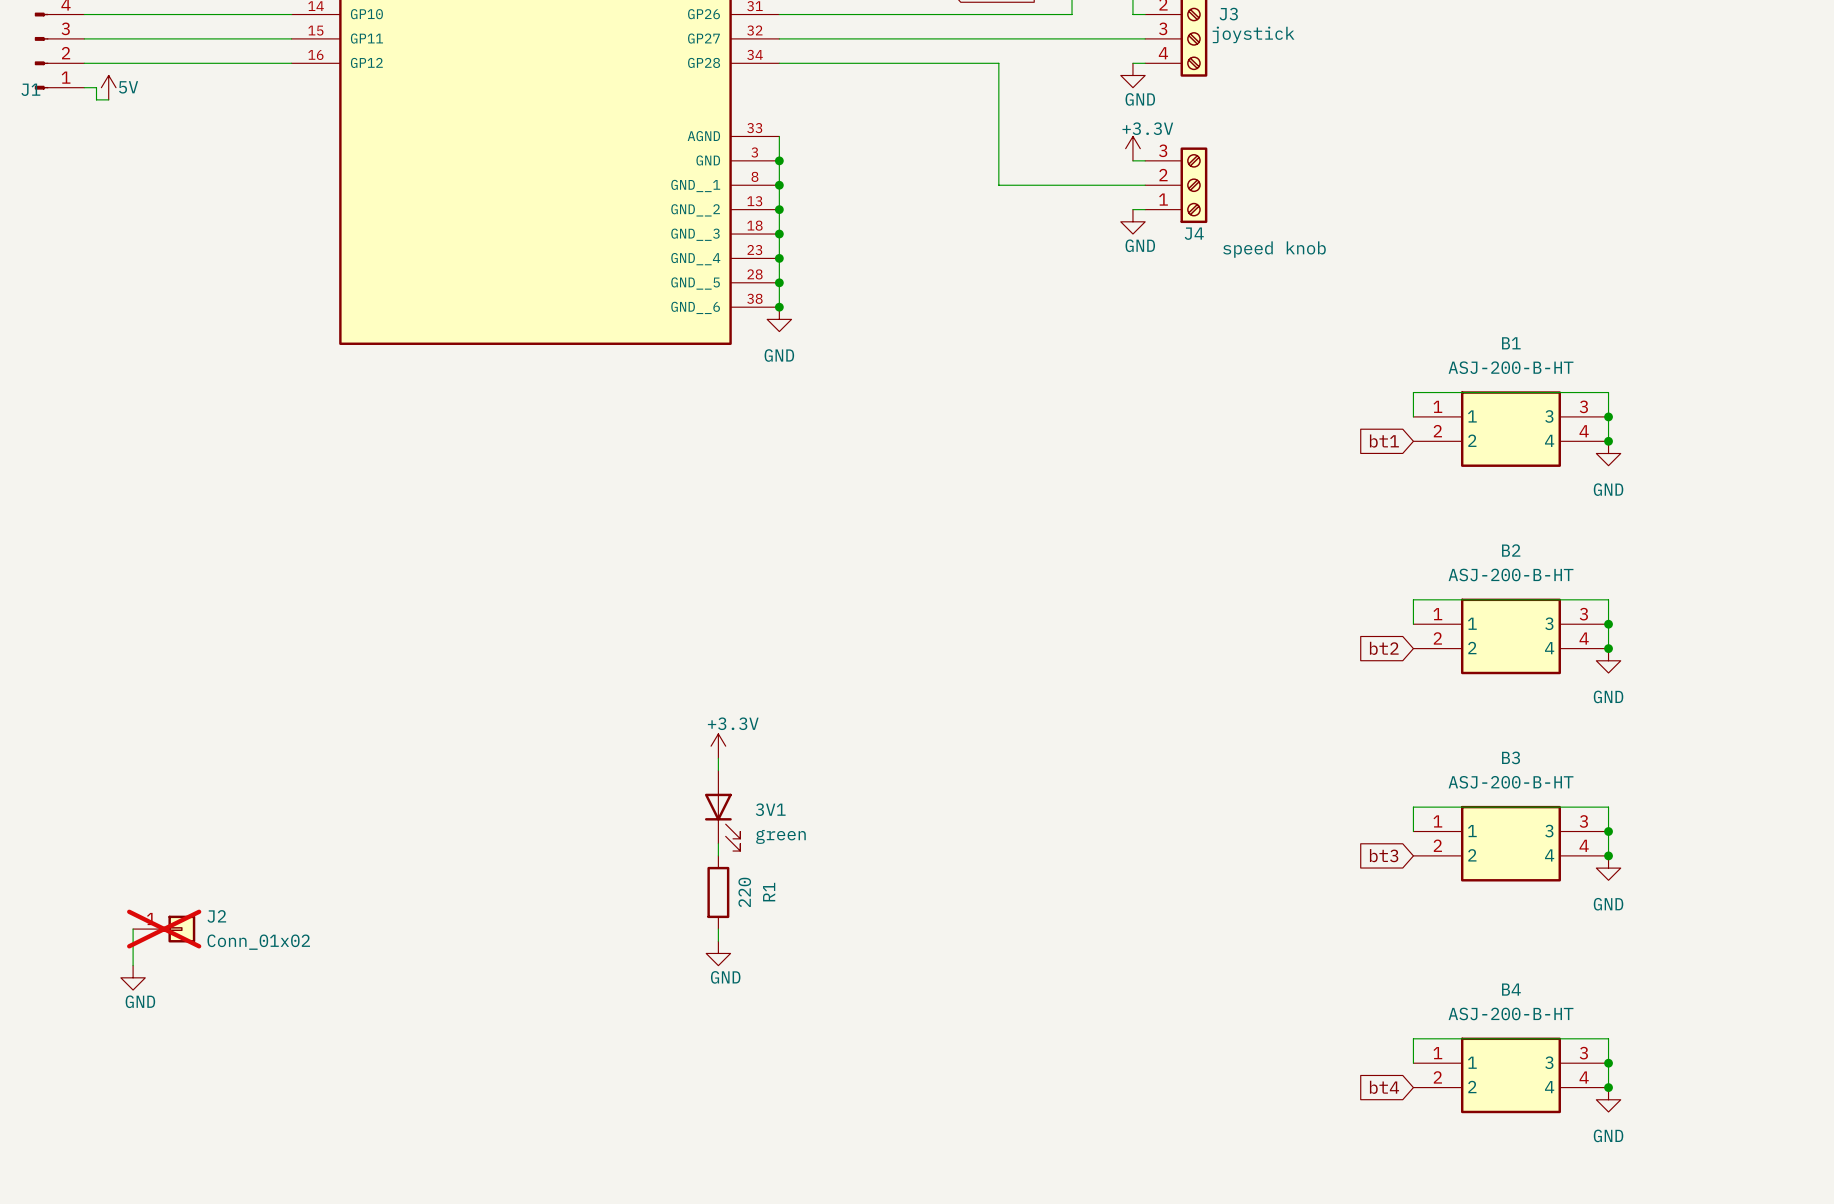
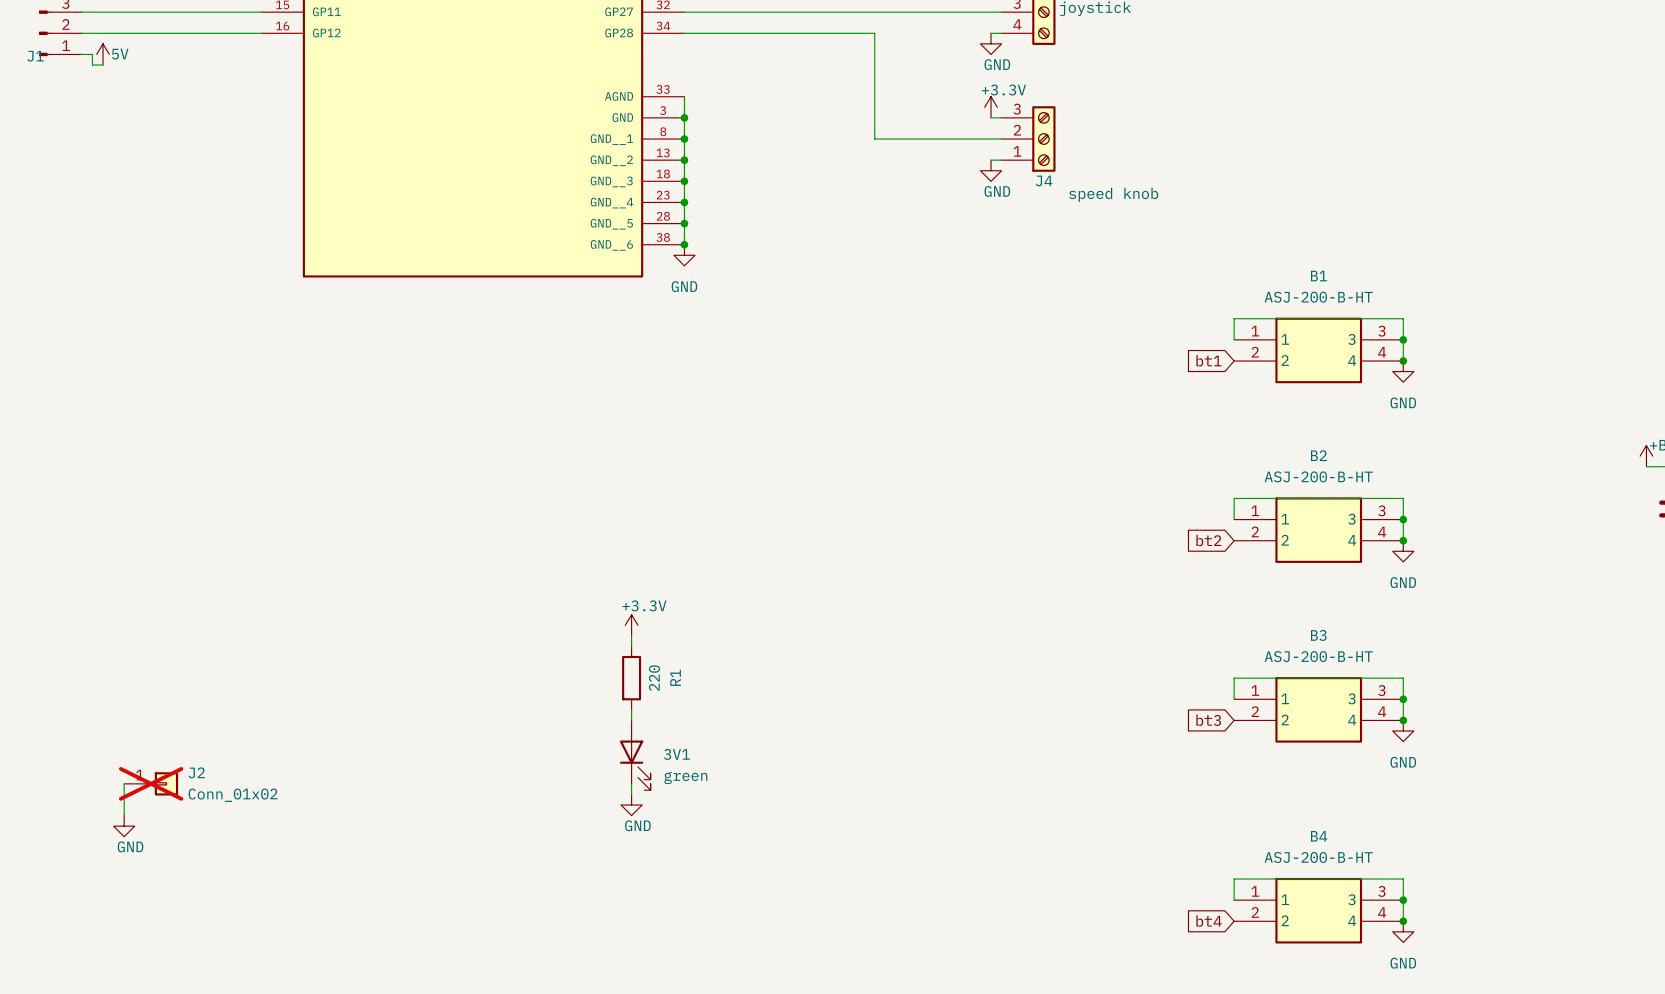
3V1 position: (722, 810) -> (635, 755)
R1 position: (718, 892) -> (631, 678)

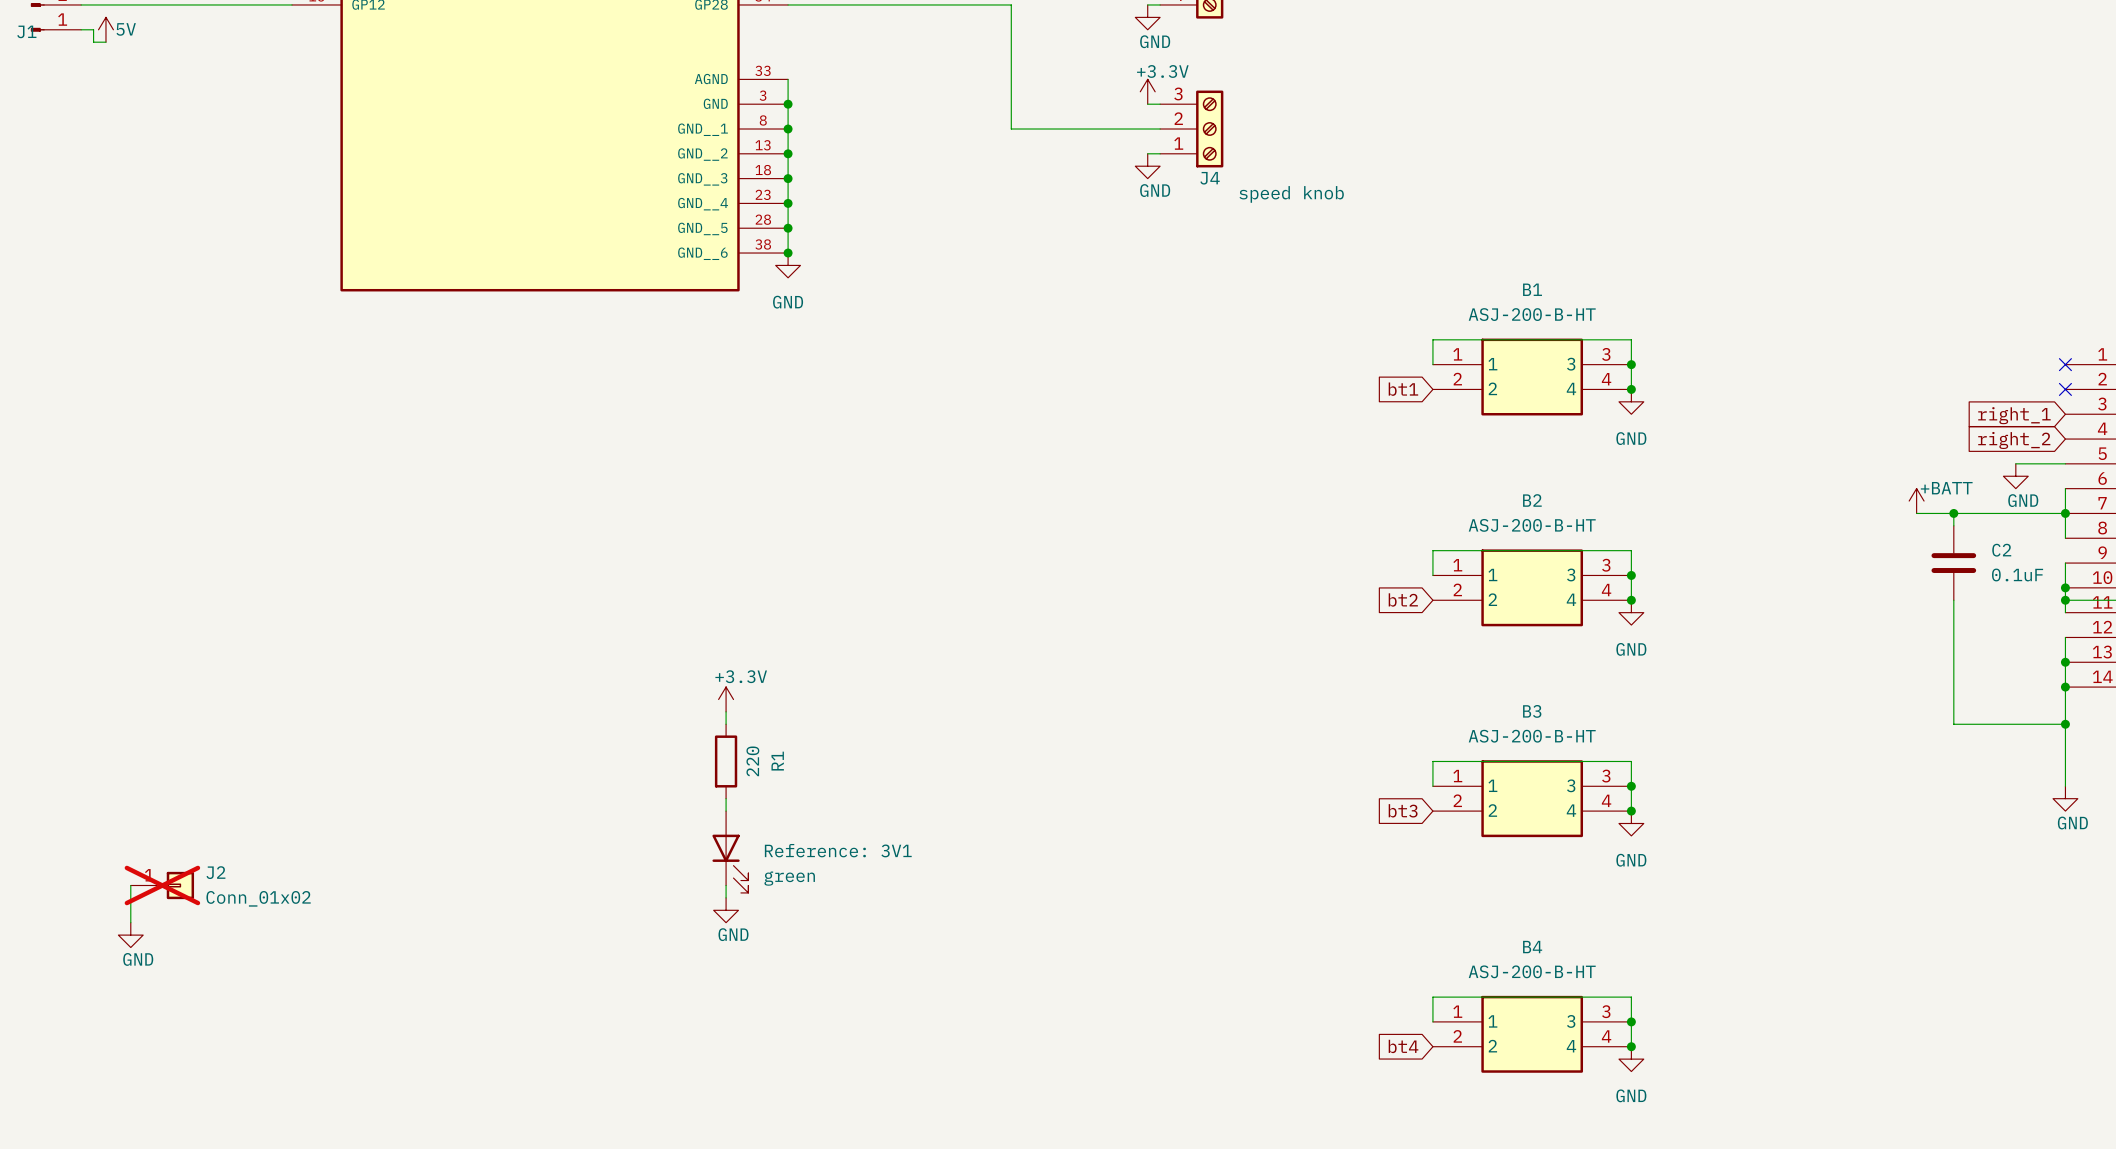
3V1 name: 3V1 (676, 754) -> Reference: 3V1 (838, 850)

